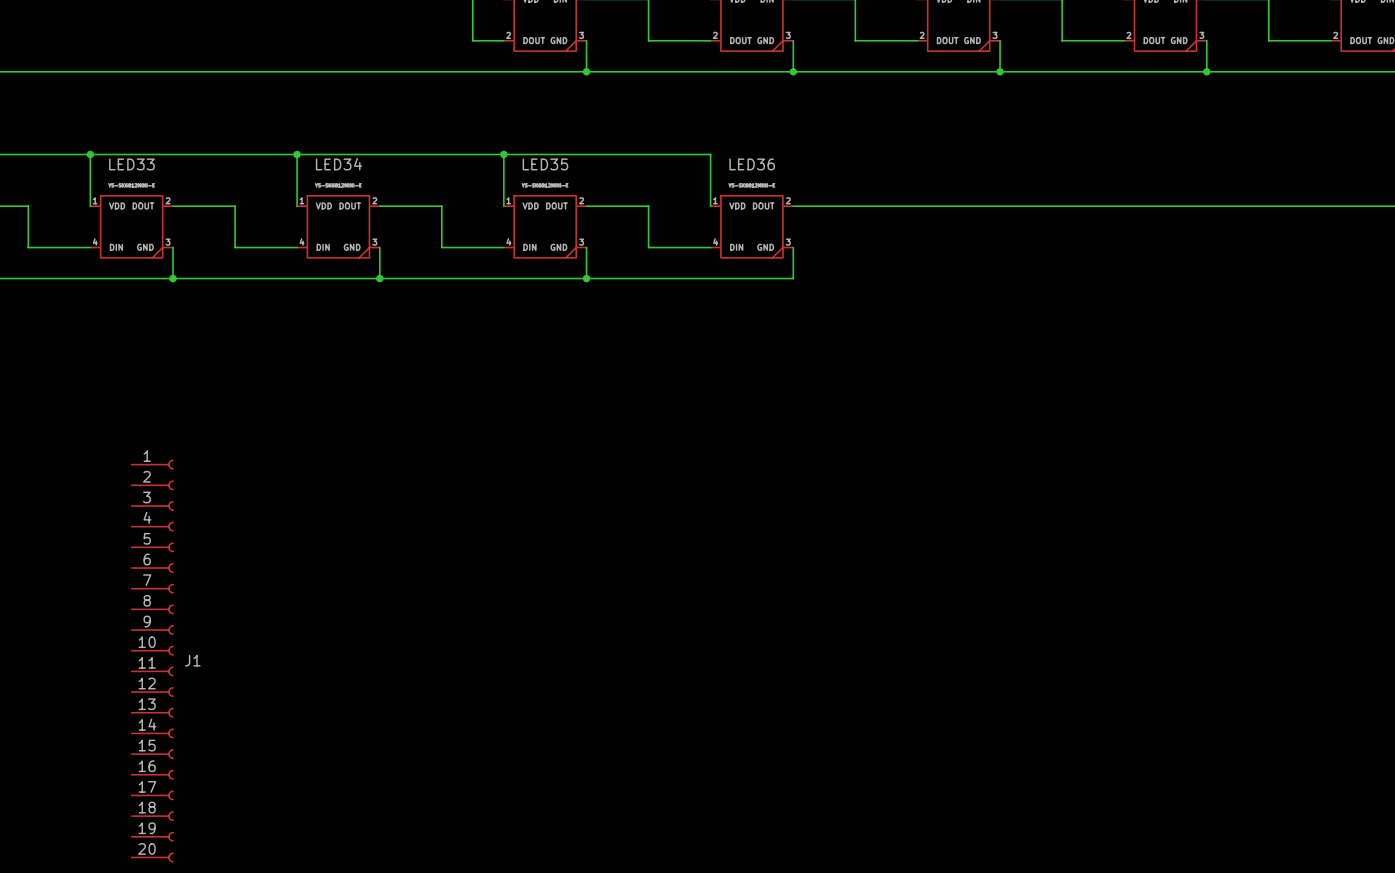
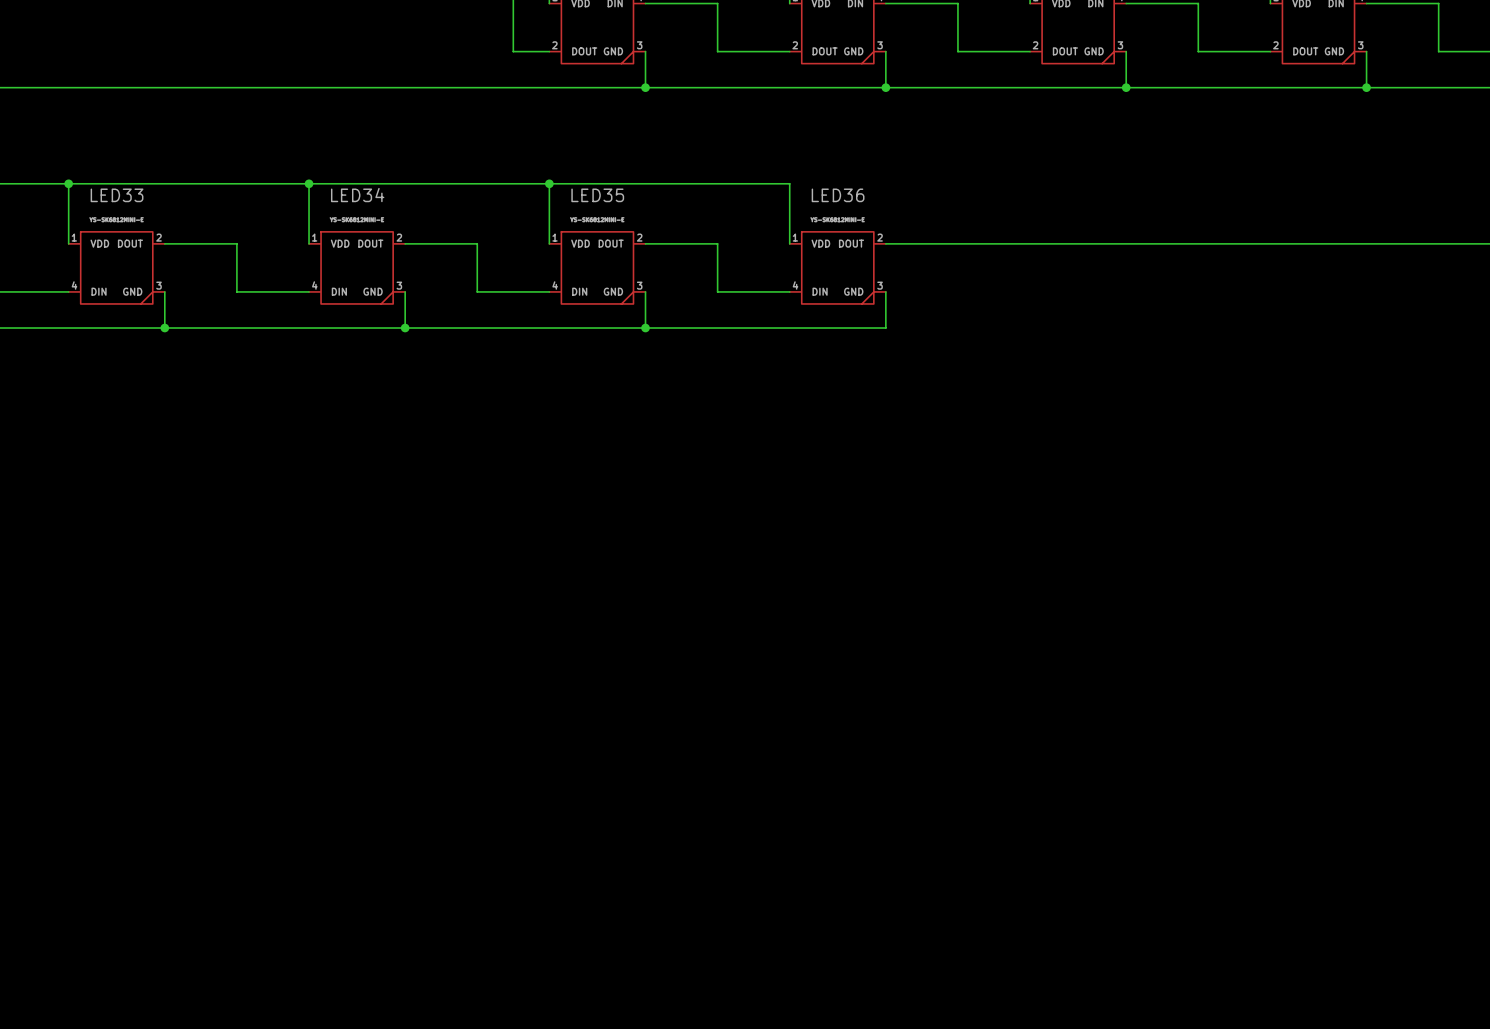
J1: (152, 661) -> none

